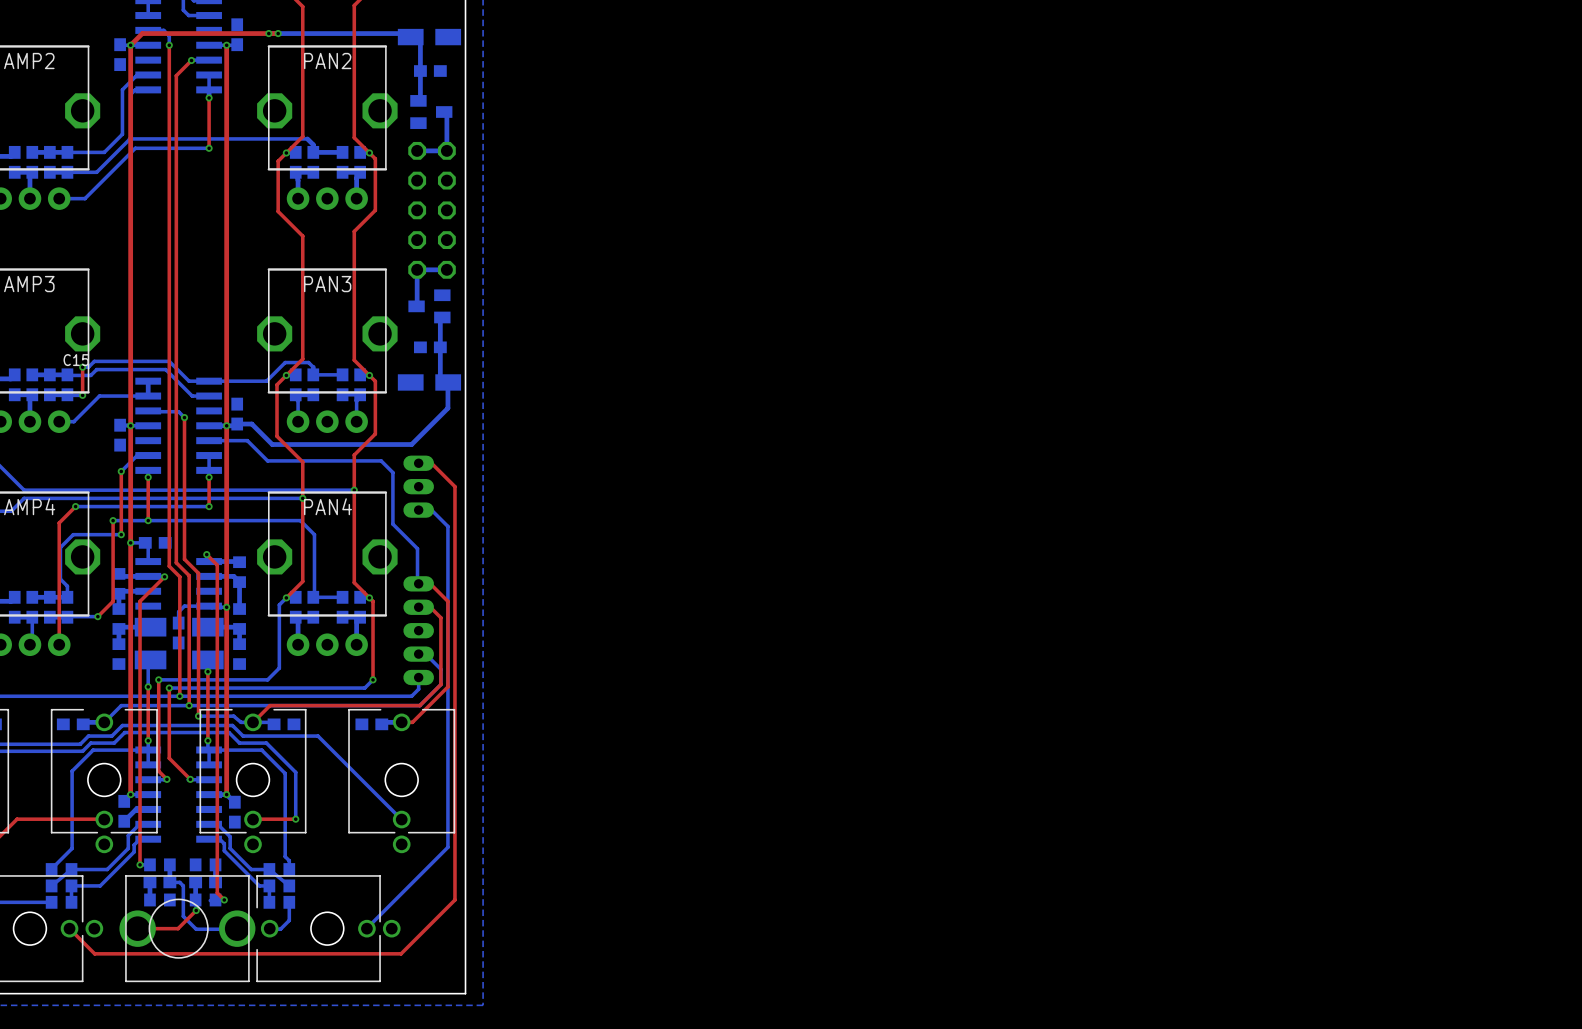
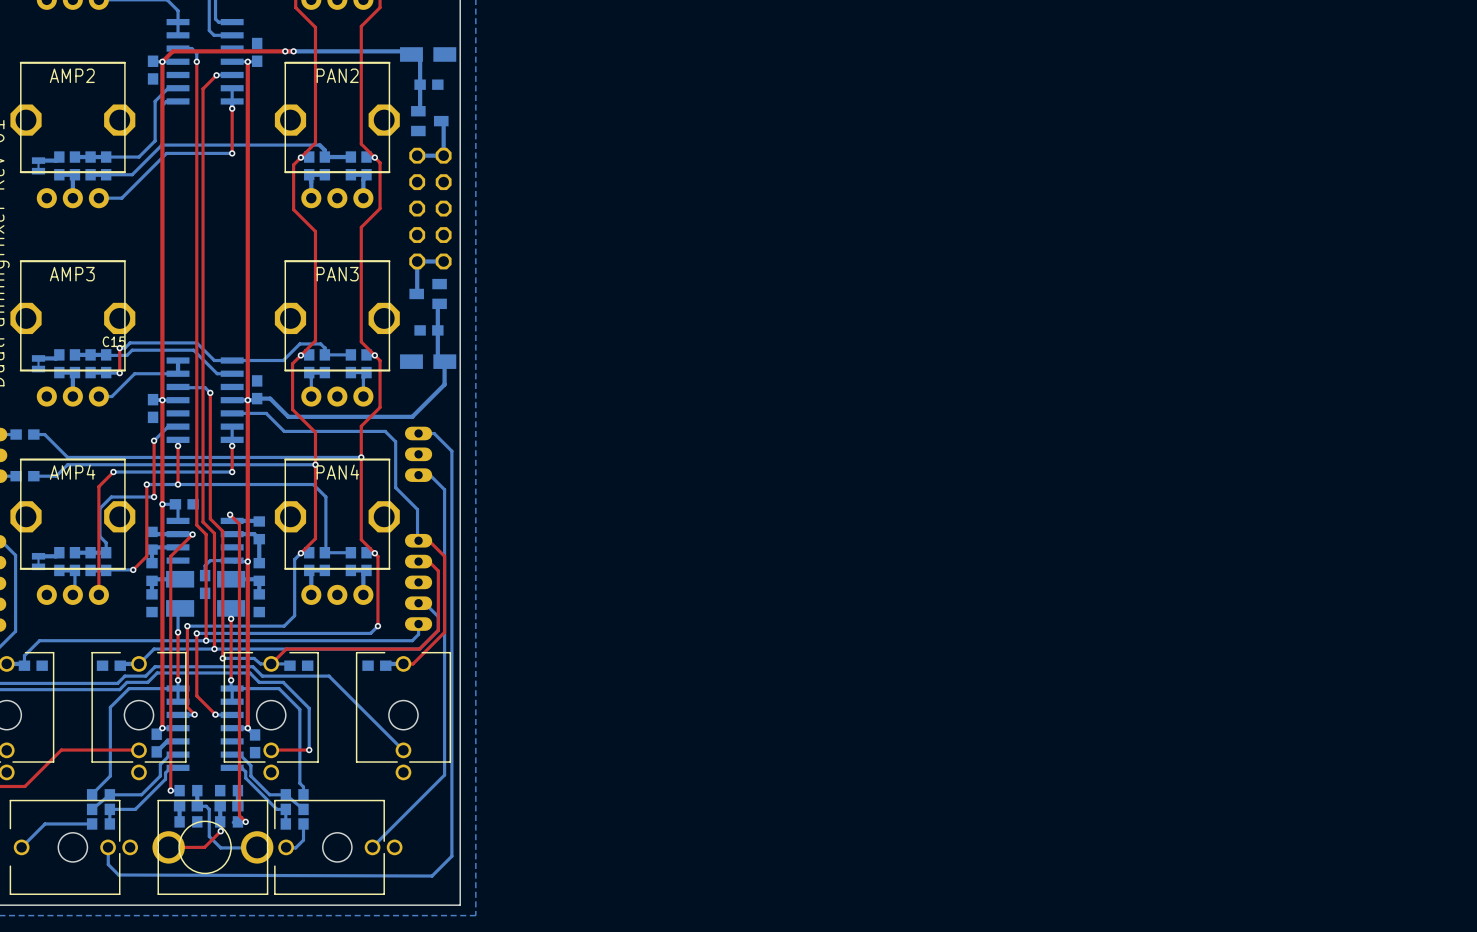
top track: (418, 463) (431, 463) (454, 486) (454, 899) (401, 953) (94, 953) (69, 928) -> none
bottom track: none -> (418, 433) (434, 433) (451, 451) (451, 856) (432, 876) (118, 874) (108, 864) (108, 847)

